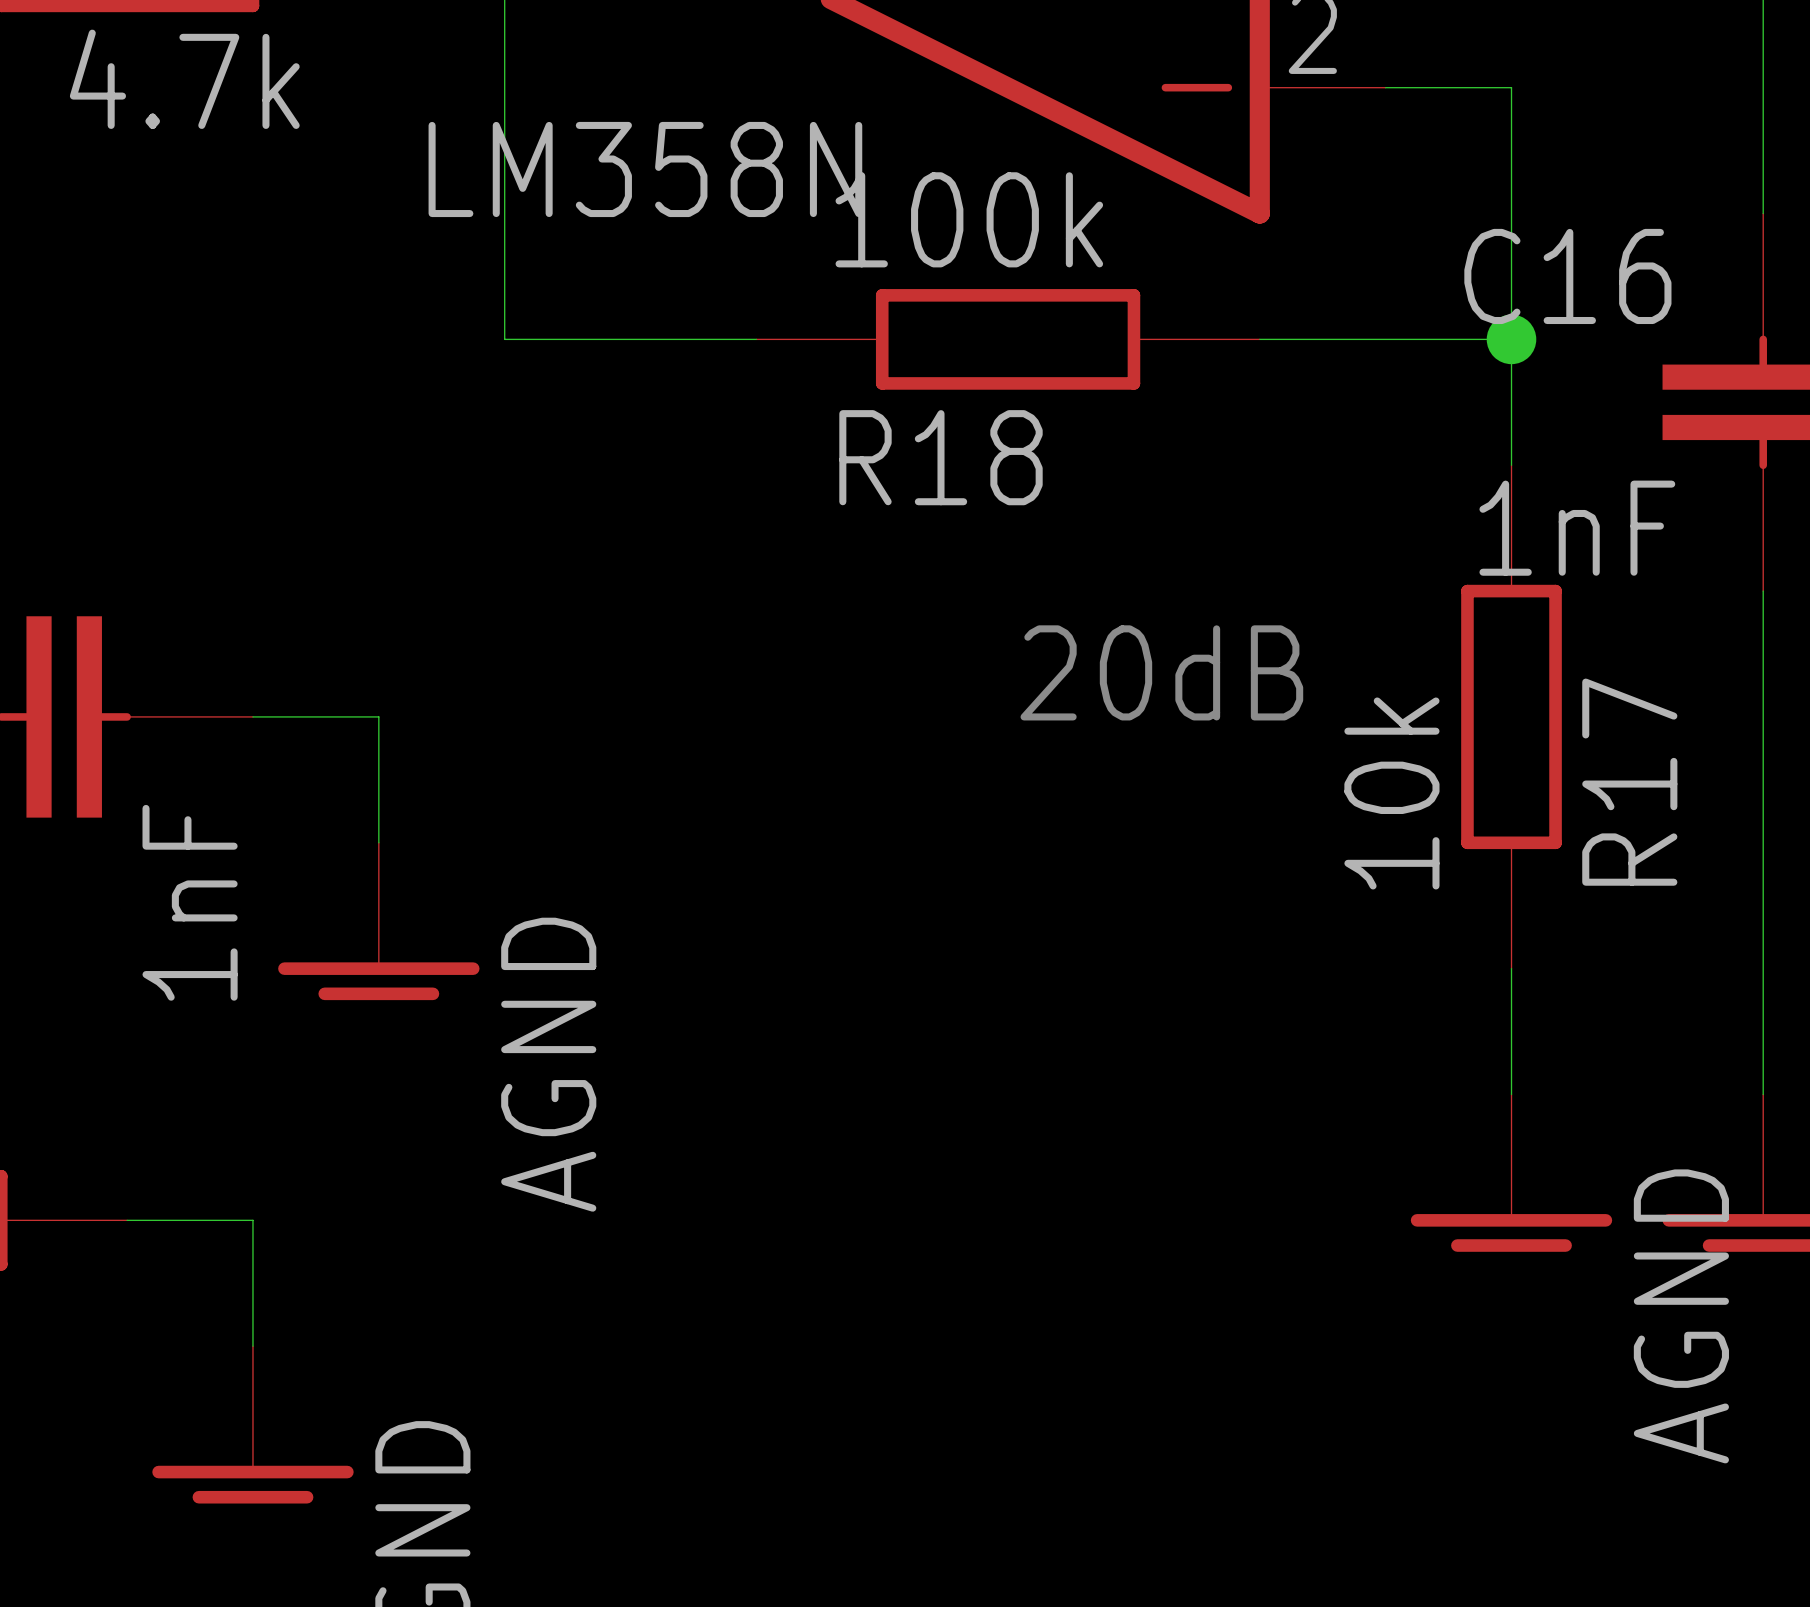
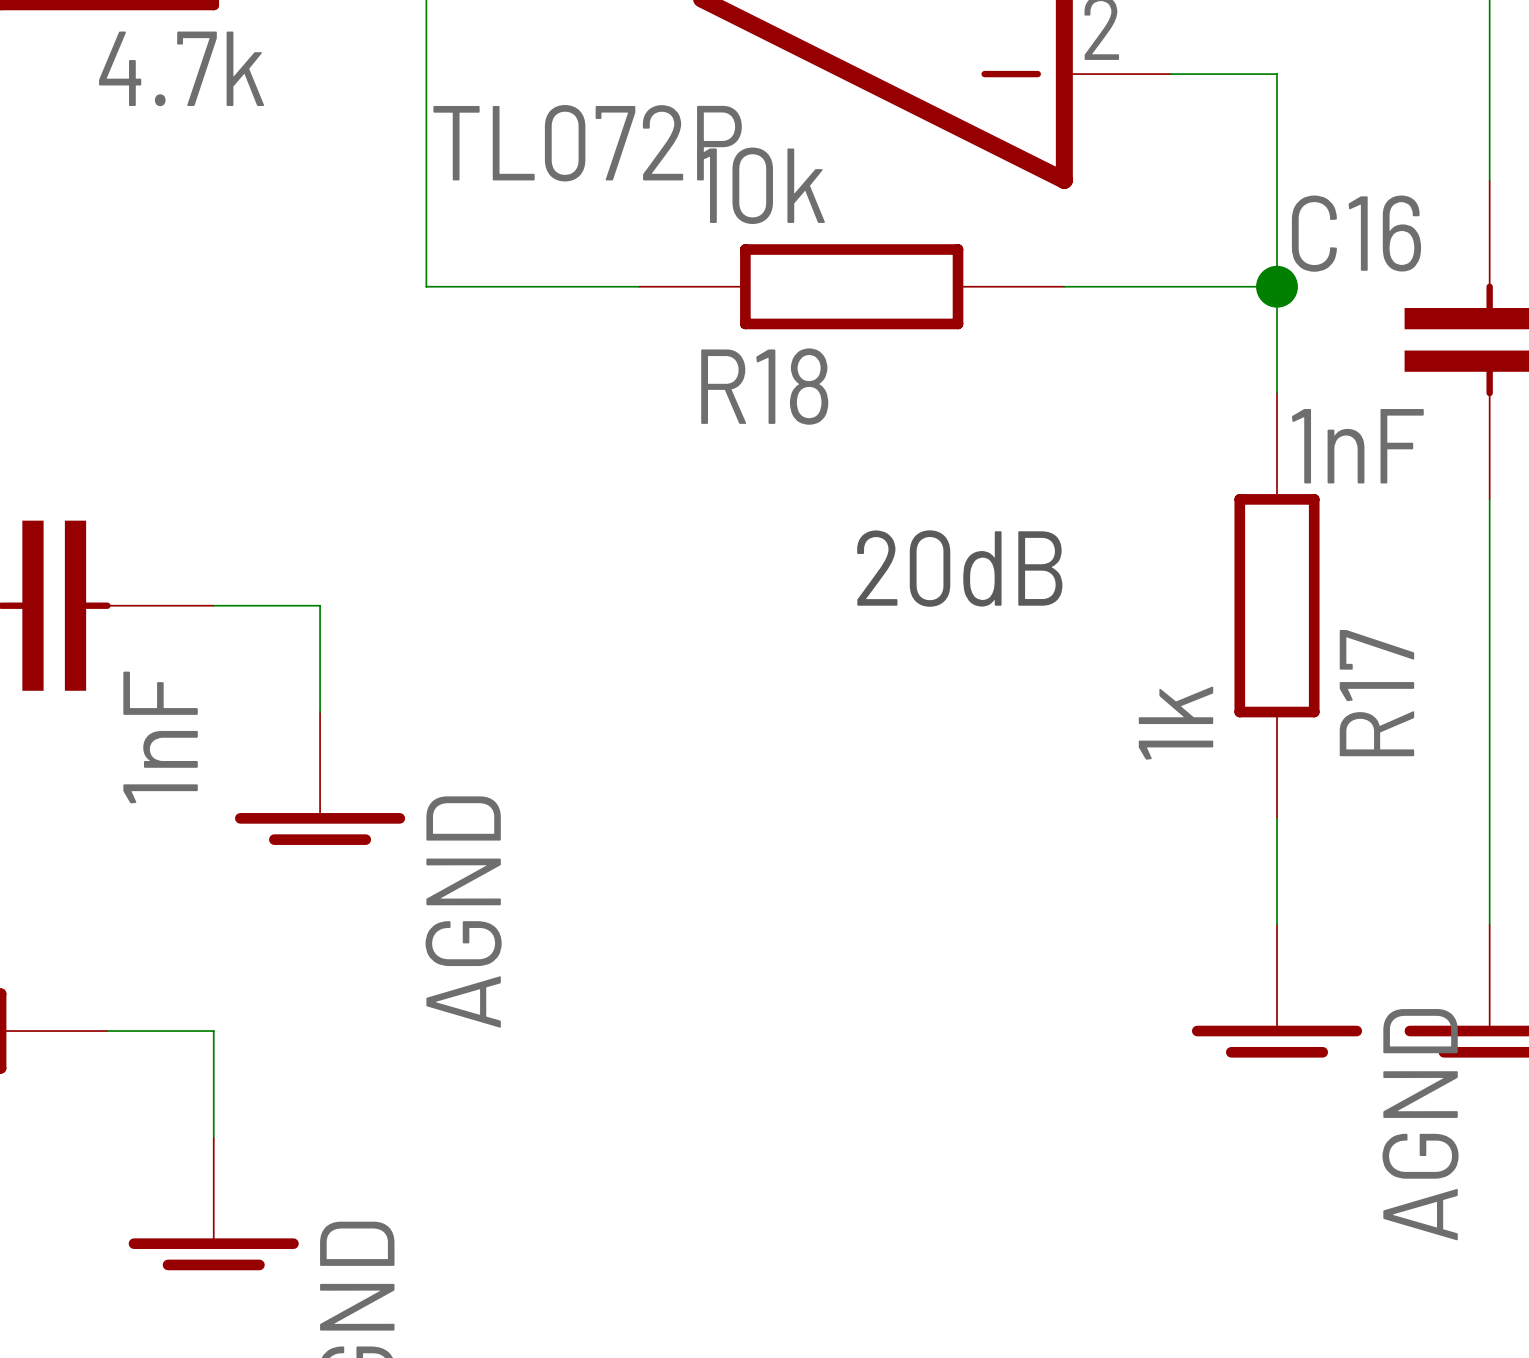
part value: LM358N (645, 169) -> TL072P (587, 143)
R18 value: 100k (969, 219) -> 10k (761, 185)
R17 value: 10k (1391, 793) -> 1k (1175, 723)

